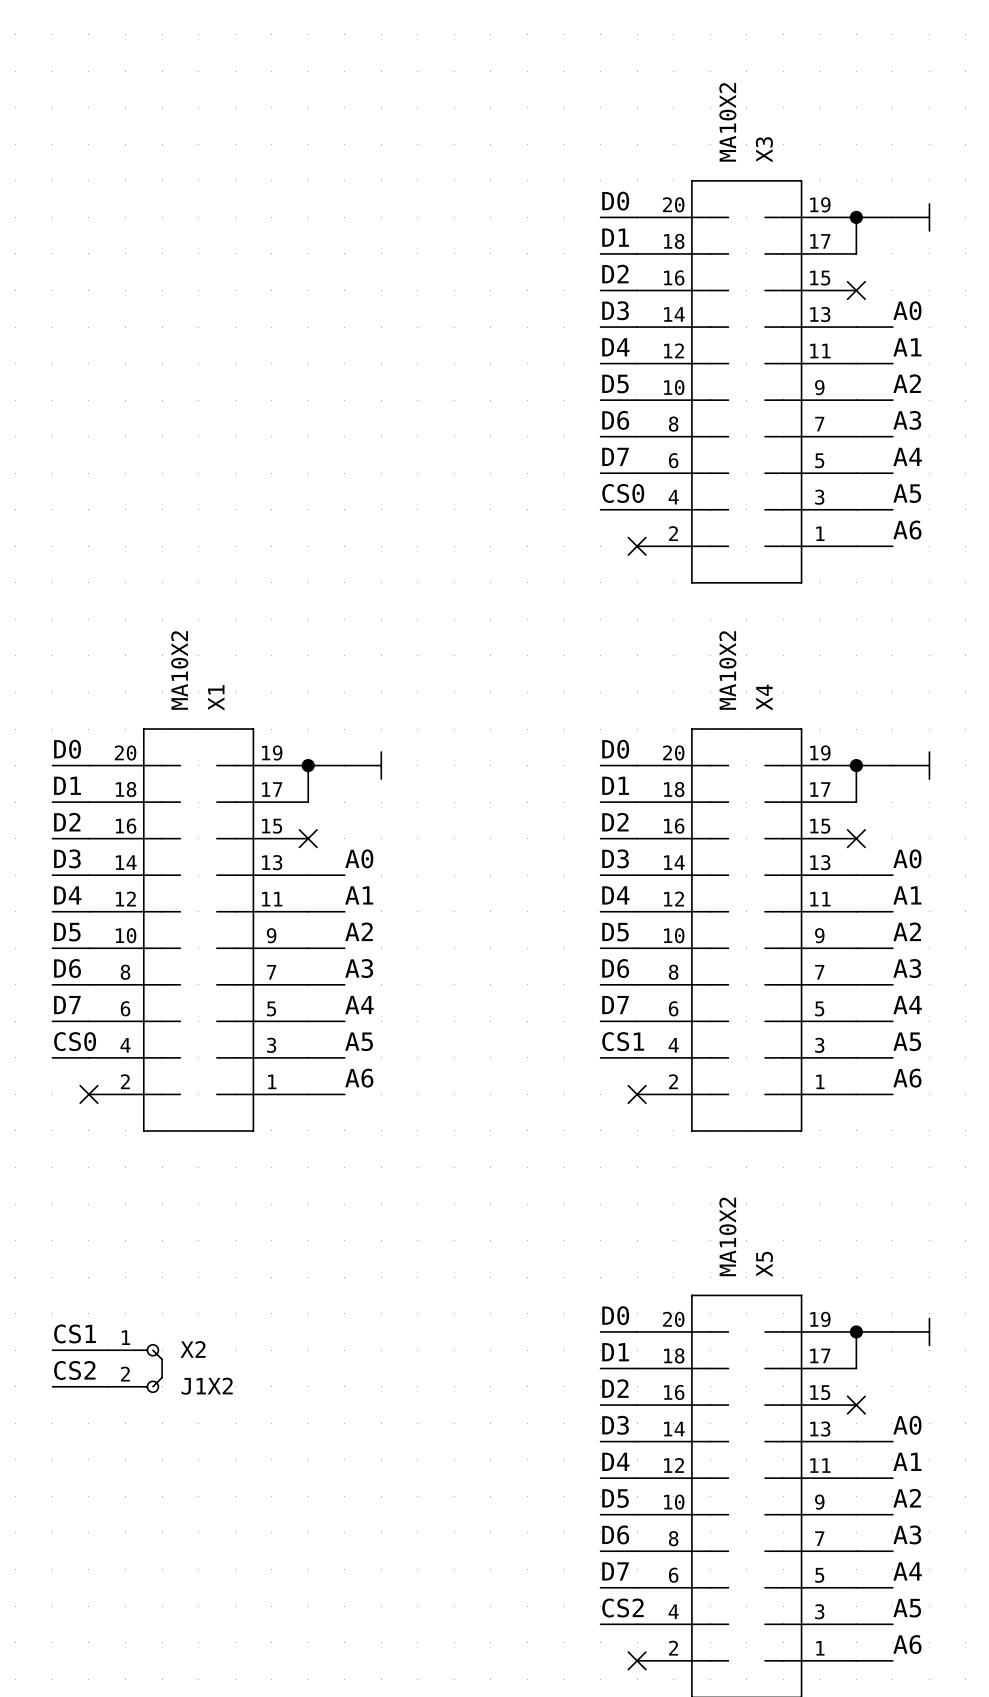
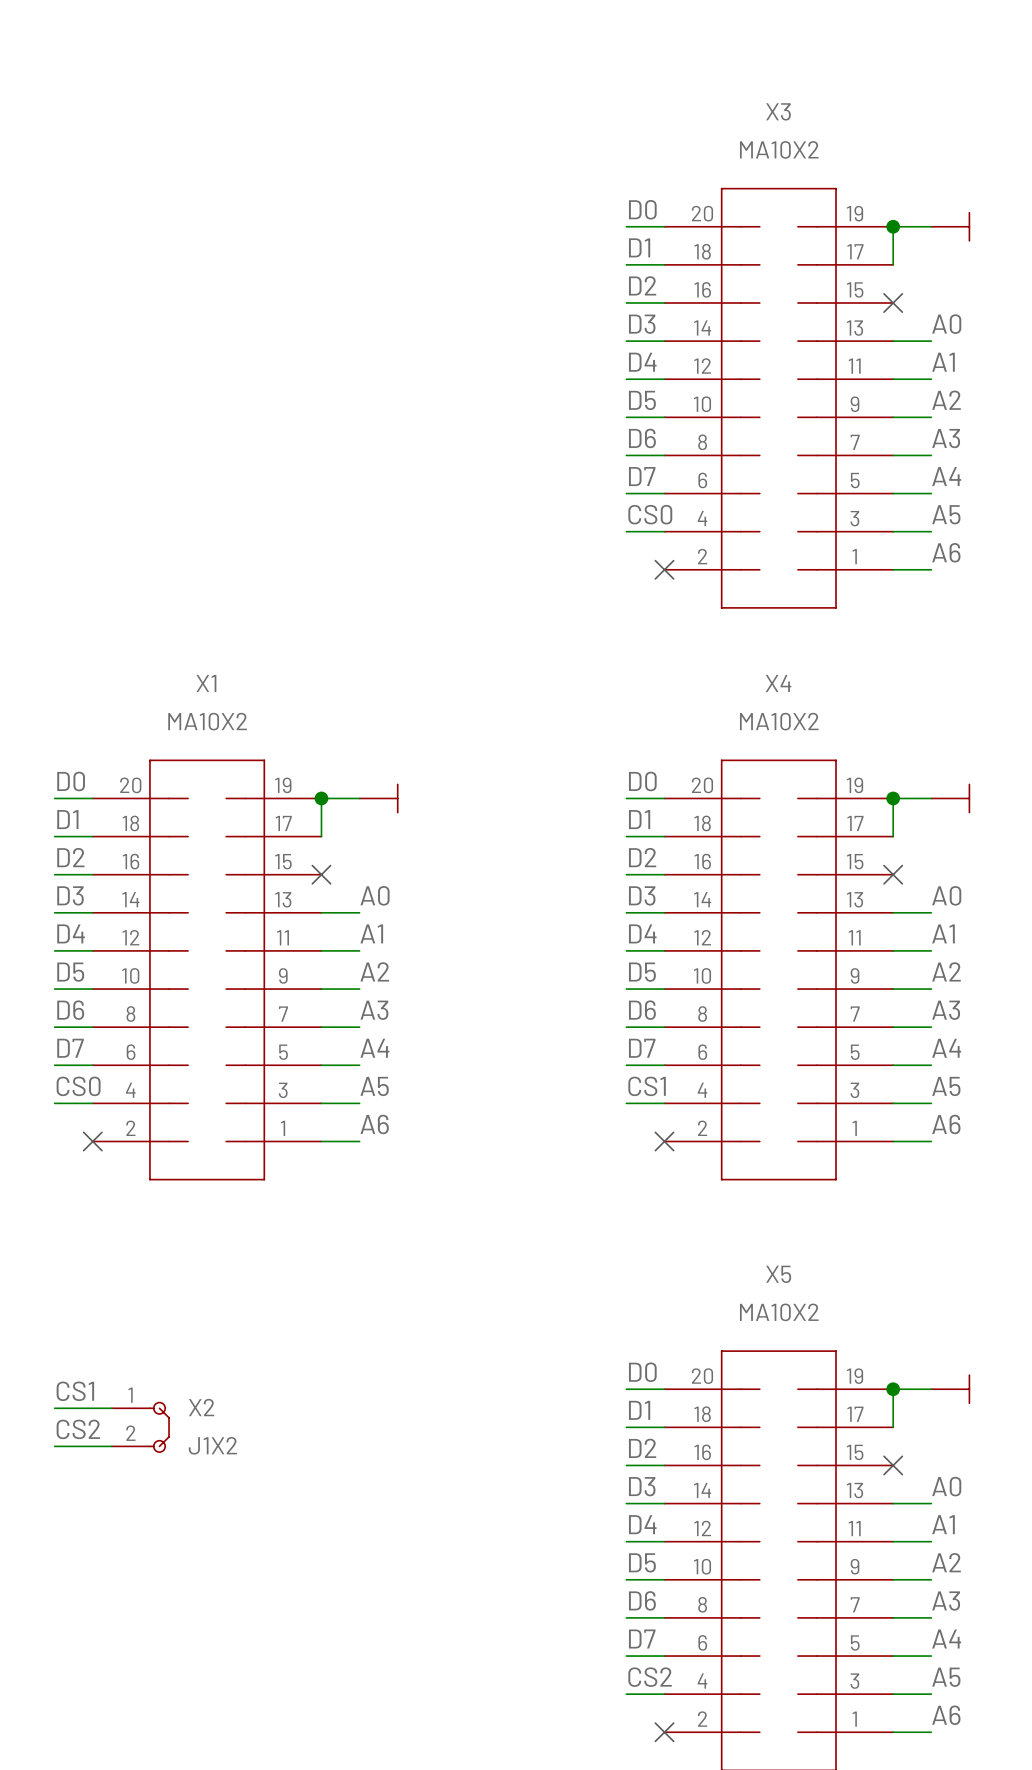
X3 value rotation: 0° (727, 122) -> 90° clockwise (779, 149)
X3 name rotation: 0° (764, 149) -> 90° clockwise (778, 111)
X1 value rotation: 0° (179, 670) -> 90° clockwise (207, 721)
X4 value rotation: 0° (727, 670) -> 90° clockwise (779, 721)
X1 name rotation: 0° (216, 697) -> 90° clockwise (206, 683)
X4 name rotation: 0° (764, 697) -> 90° clockwise (778, 683)
X5 value rotation: 0° (727, 1236) -> 90° clockwise (779, 1312)
X5 name rotation: 0° (764, 1264) -> 90° clockwise (778, 1274)

